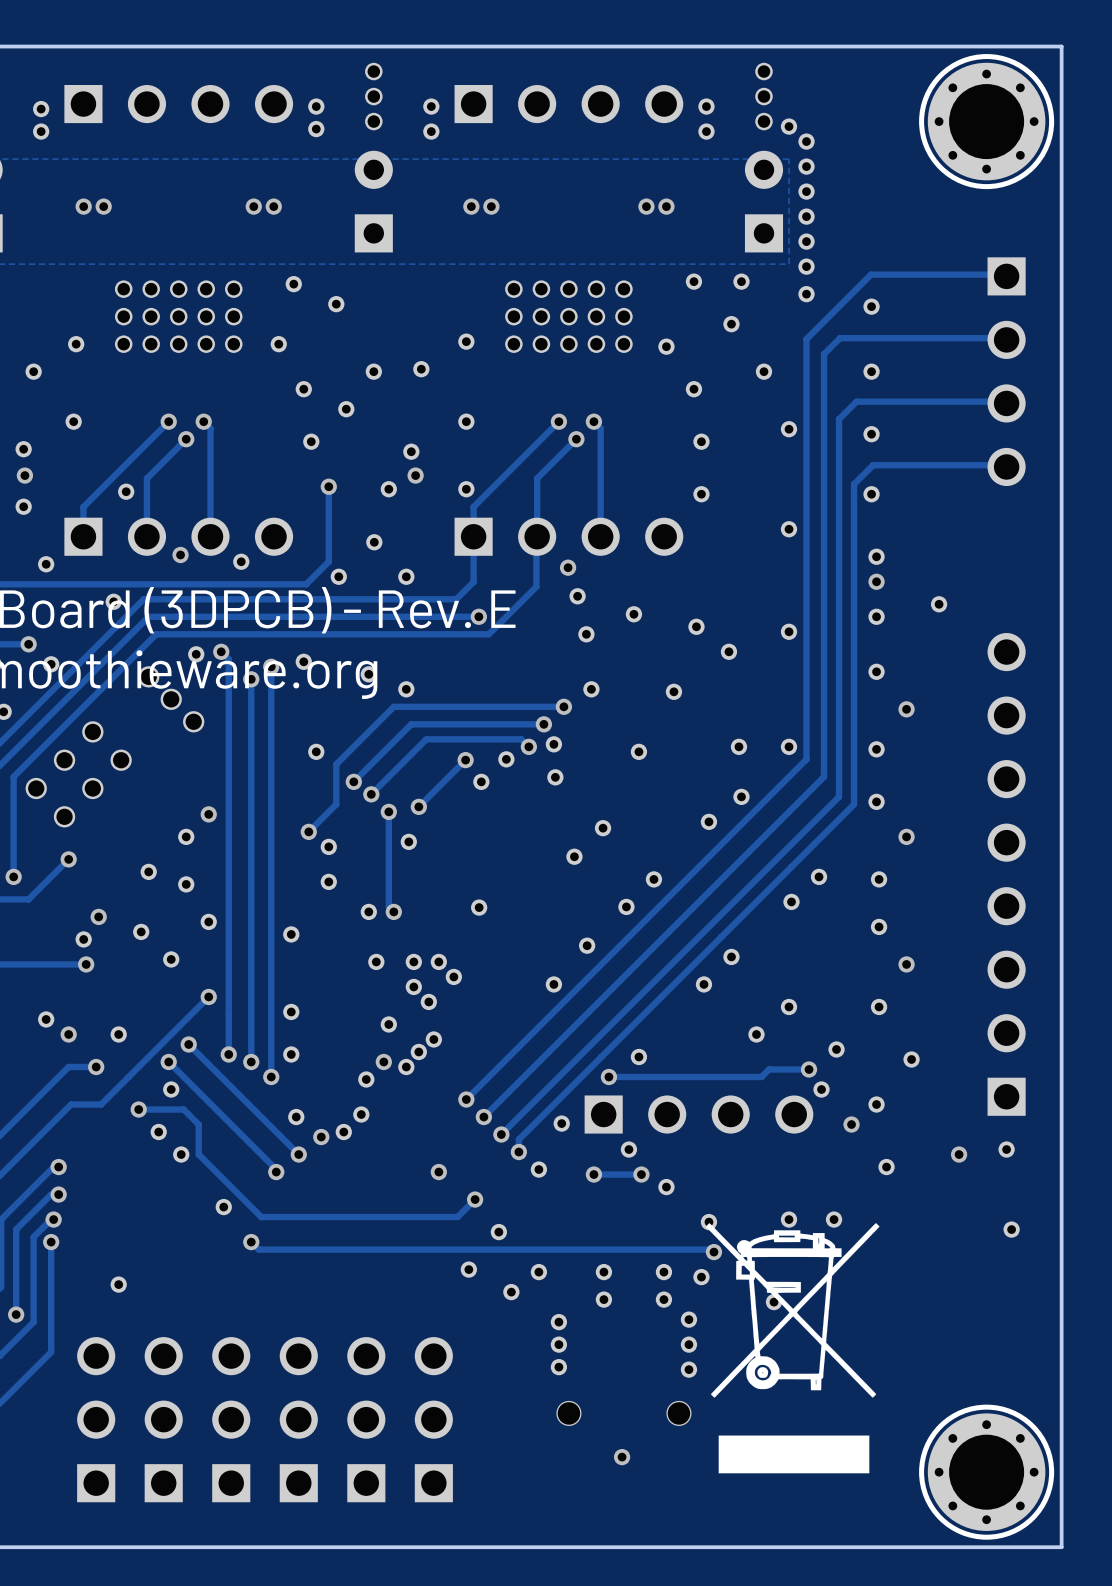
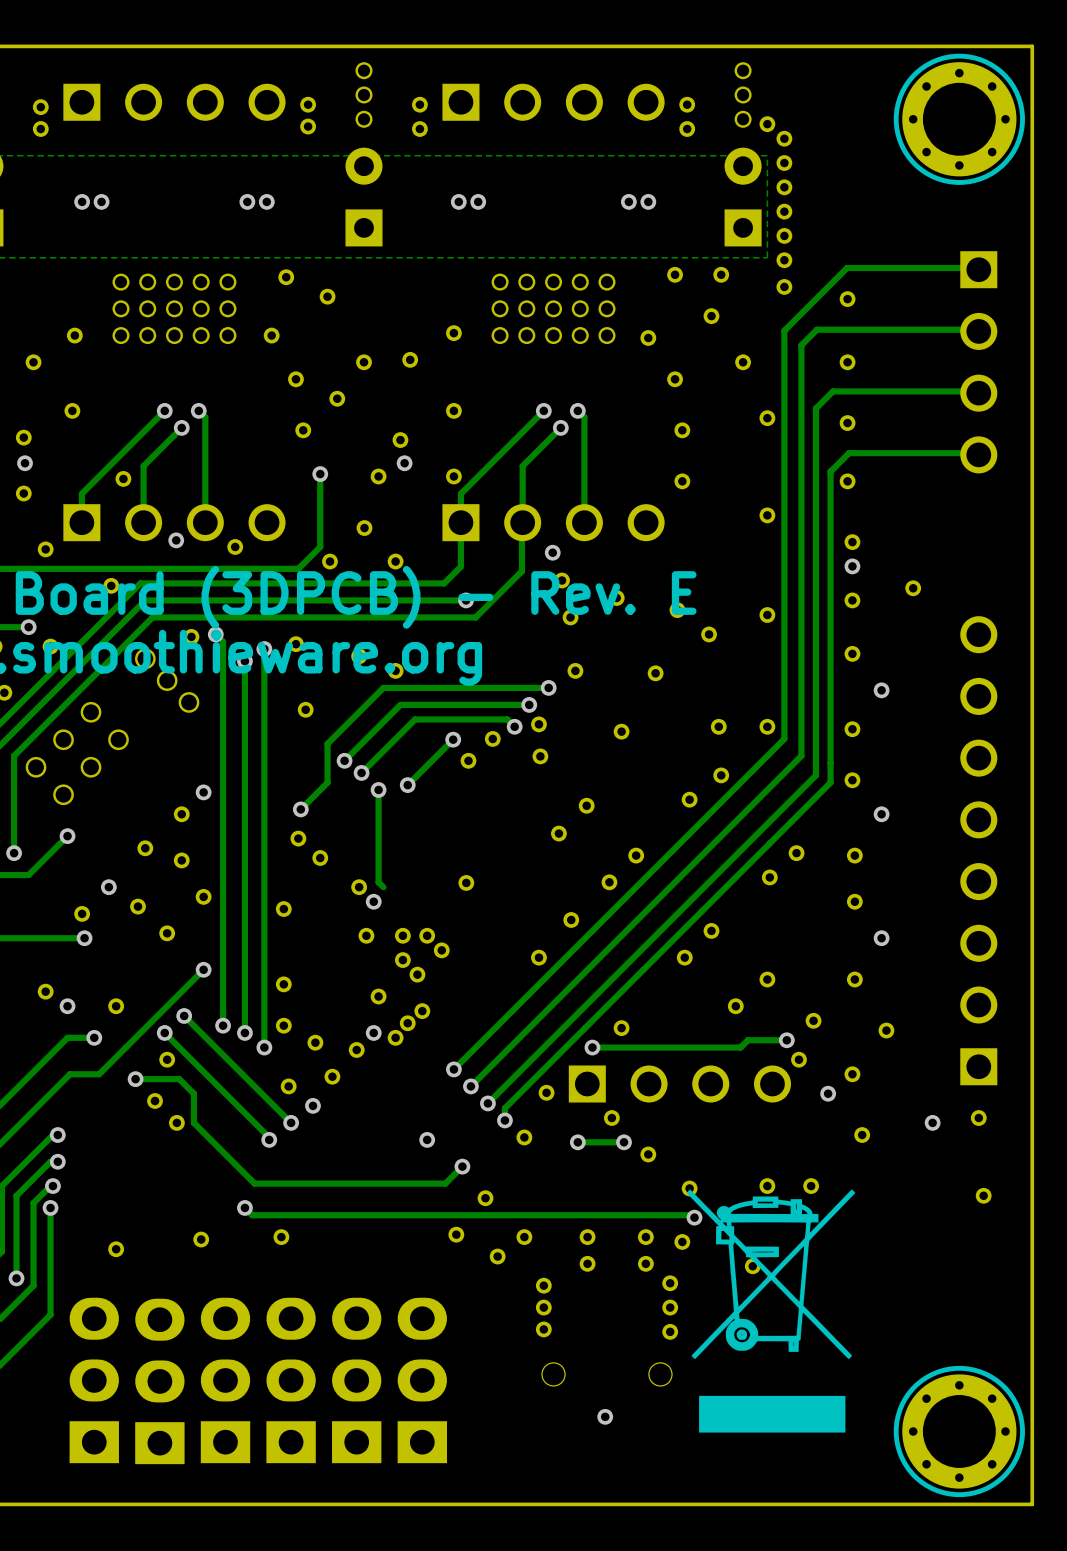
part position: (316, 751) -> (305, 709)
part: (408, 841) -> none
part position: (328, 846) -> (298, 838)
via position: (393, 911) -> (373, 901)
via position: (98, 916) -> (108, 887)
part: none -> (315, 1042)
part: none -> (332, 1076)
part: (361, 1114) -> none
part: (343, 1132) -> none
part: (223, 1207) -> none
part: none -> (281, 1237)
part: none -> (201, 1239)
part footprint: [77, 1337, 116, 1503] -> [69, 1297, 119, 1464]
part footprint: [144, 1337, 183, 1503] -> [135, 1298, 185, 1465]
part footprint: [212, 1337, 251, 1503] -> [200, 1297, 251, 1464]
part footprint: [279, 1337, 318, 1503] -> [266, 1297, 316, 1464]
part footprint: [347, 1337, 386, 1503] -> [332, 1297, 382, 1464]
part footprint: [414, 1337, 453, 1503] -> [397, 1297, 448, 1464]

